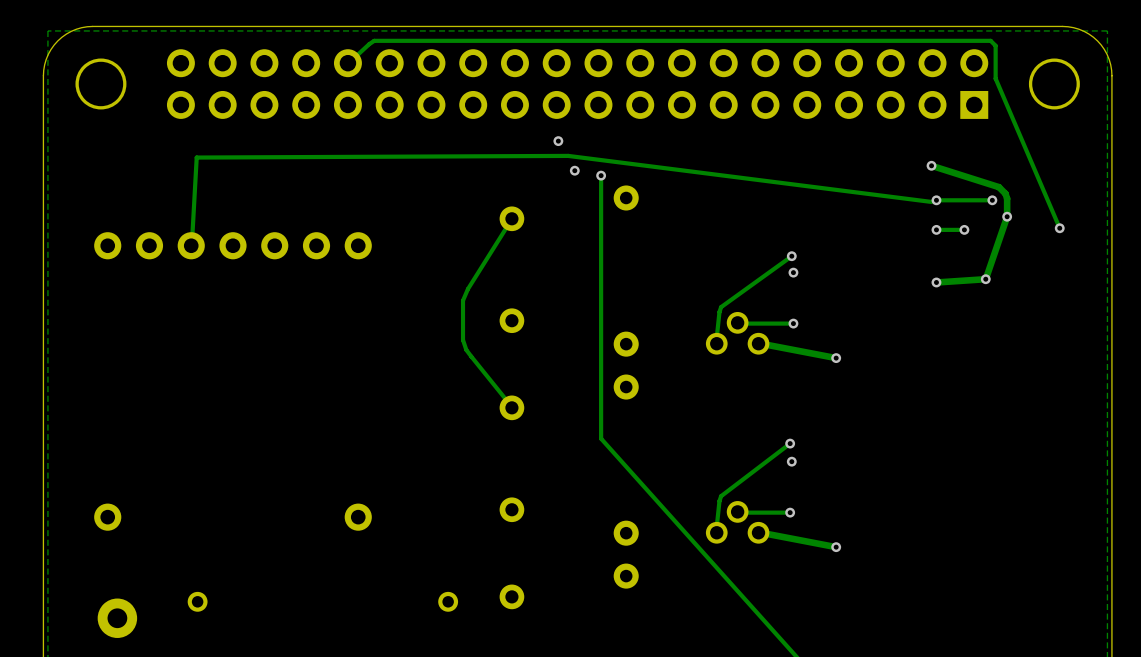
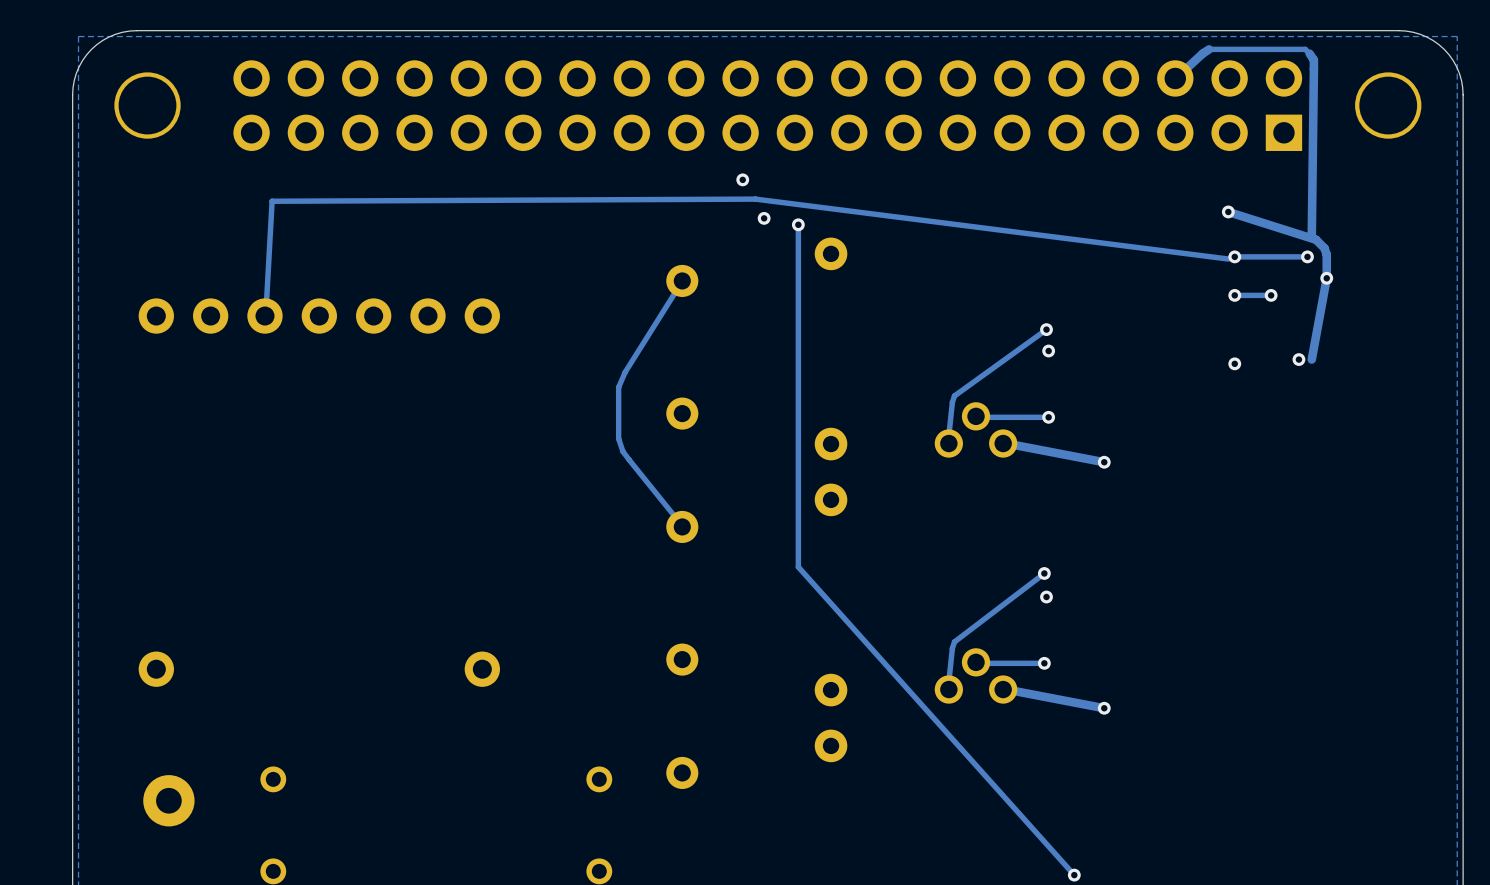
track: (916, 40) (374, 40) (347, 63) -> (1209, 49) (1174, 79)
track: (994, 44) (995, 45) (995, 78) (1059, 228) -> (1309, 53) (1313, 60) (1311, 237)
track: (1007, 216) (985, 279) (936, 282) -> (1326, 278) (1311, 359)
via: (1059, 228) -> none

